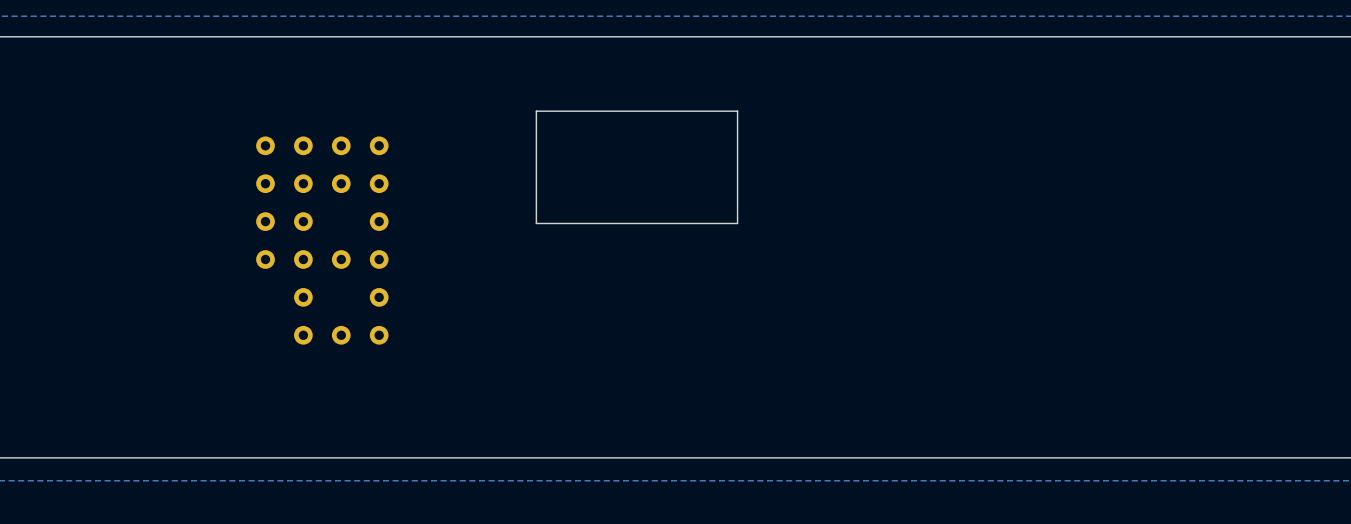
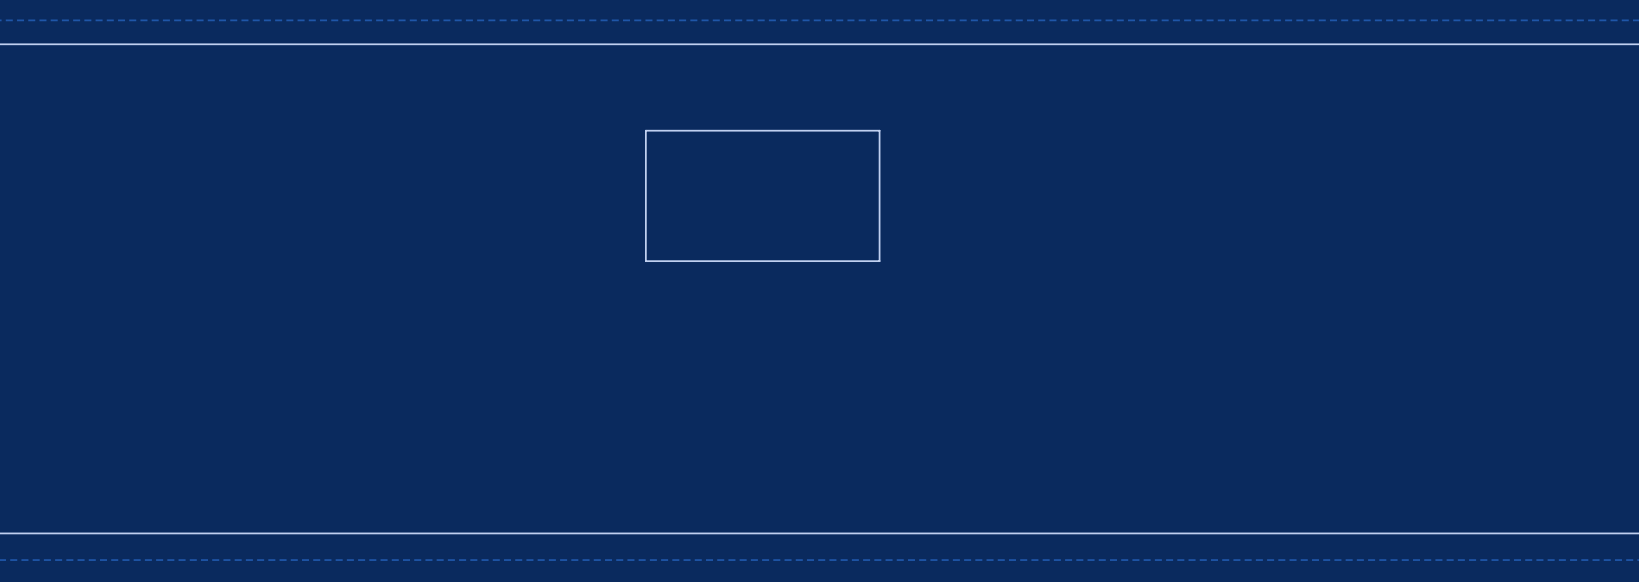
part: (265, 145) -> none
part: (303, 145) -> none
part: (341, 145) -> none
part: (379, 145) -> none
part: (265, 183) -> none
part: (303, 183) -> none
part: (341, 183) -> none
part: (379, 183) -> none
part: (265, 221) -> none
part: (303, 221) -> none
part: (379, 221) -> none
part: (265, 259) -> none
part: (303, 259) -> none
part: (341, 259) -> none
part: (379, 259) -> none
part: (303, 297) -> none
part: (379, 297) -> none
part: (303, 335) -> none
part: (341, 335) -> none
part: (379, 335) -> none

